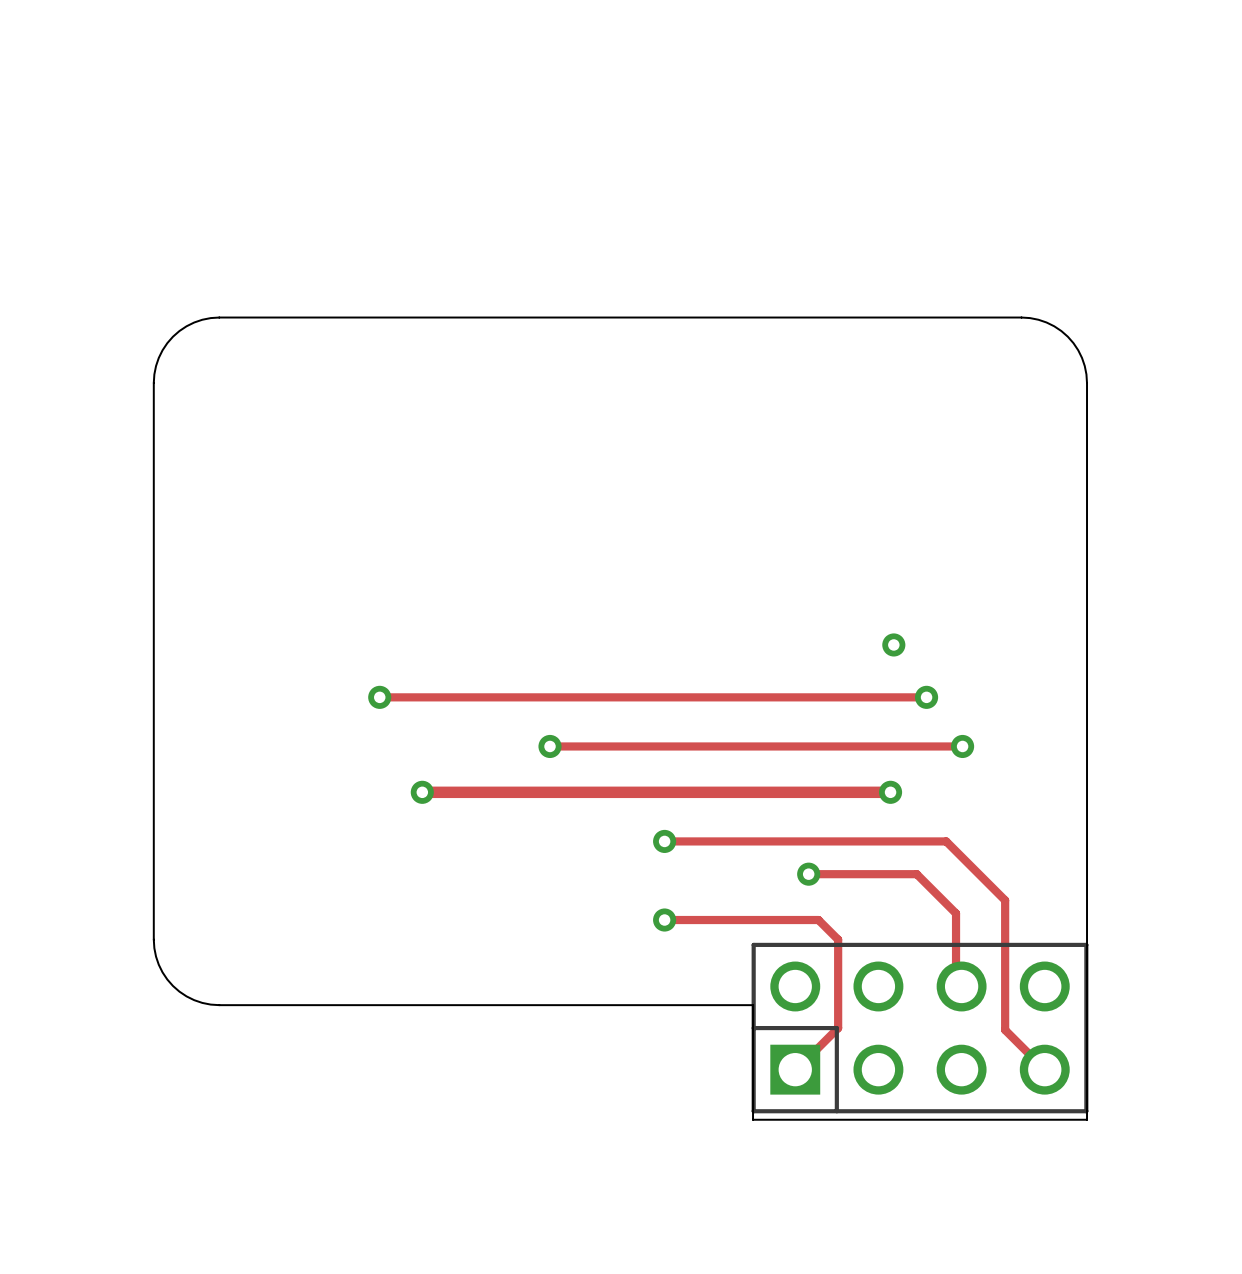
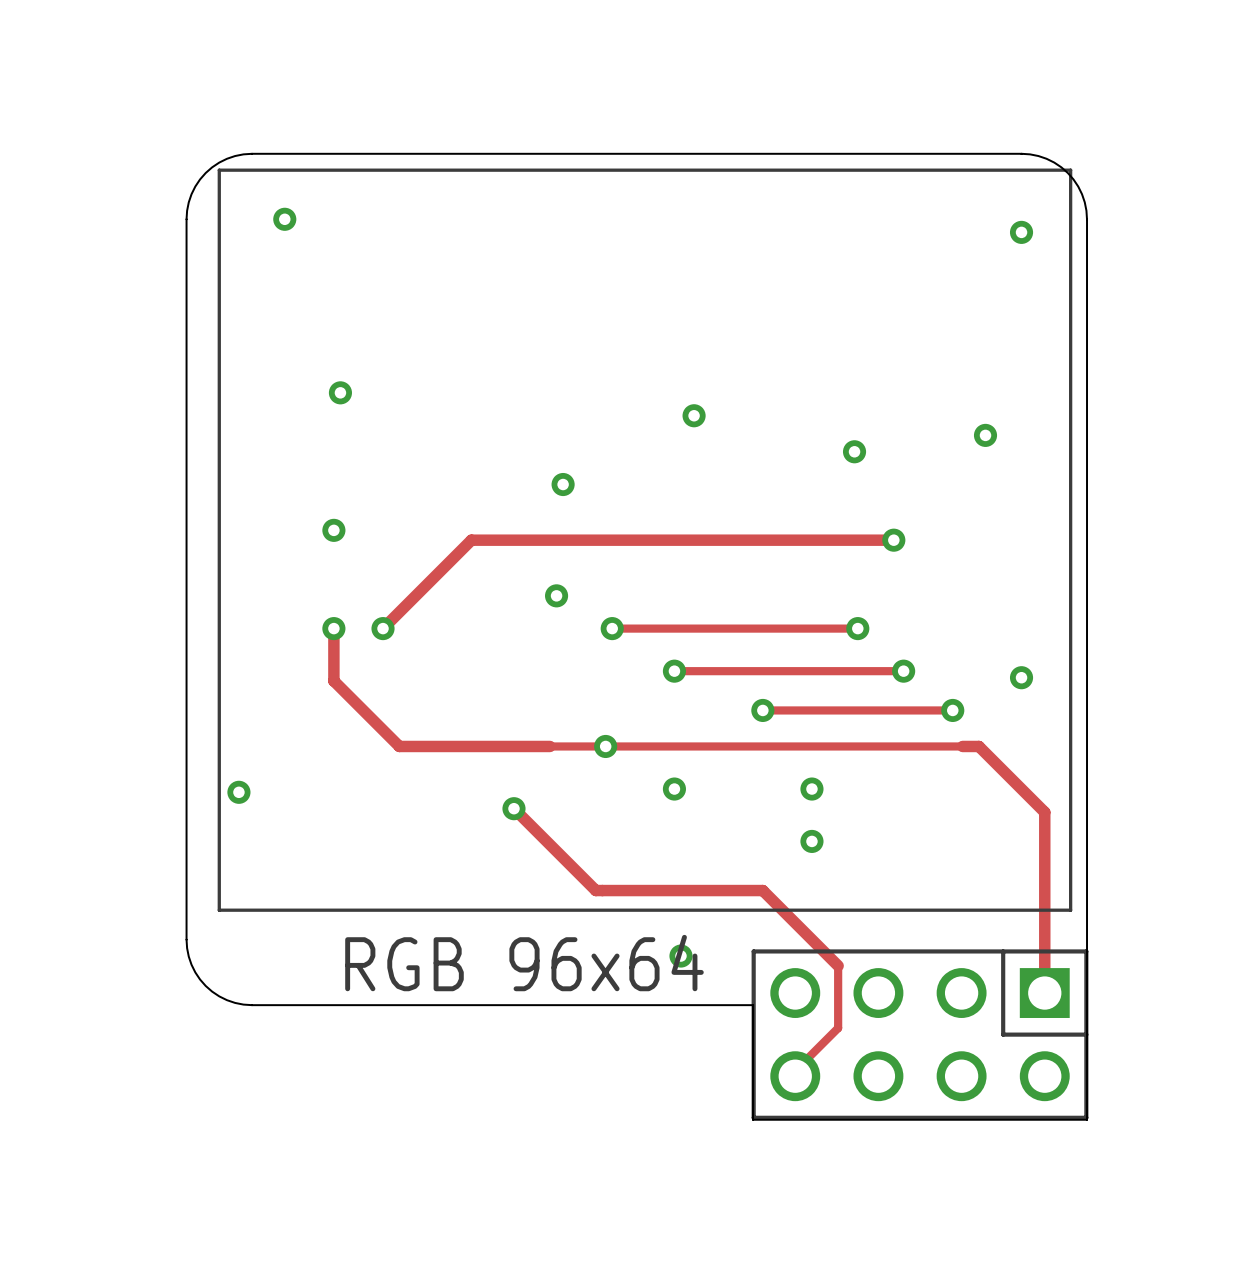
line: none -> (219, 170) (219, 910) (1070, 910) (1070, 170) (219, 170)
via: none -> (284, 219)
via: none -> (1021, 232)
board edge: (1087, 383) (1082, 357) (1067, 336) (1046, 322) (1021, 317) (219, 317) (194, 322) (179, 331) (167, 343) (158, 357) (153, 383) (154, 948) (162, 972) (172, 985) (186, 996) (210, 1004) (252, 1005) -> (1087, 383) (1087, 219) (1084, 202) (1078, 186) (1067, 172) (1054, 162) (1038, 156) (1021, 153) (252, 153) (226, 158) (212, 167) (200, 179) (191, 194) (186, 219) (186, 939) (191, 964) (205, 985) (226, 1000) (252, 1005)
via: none -> (340, 392)
via: none -> (694, 415)
via: none -> (985, 435)
via: none -> (854, 451)
via: none -> (563, 484)
via: none -> (333, 530)
track: none -> (893, 540) (471, 540) (383, 628)
via: none -> (893, 540)
via: none -> (556, 595)
track: none -> (333, 628) (333, 680) (399, 746) (550, 746)
via: none -> (333, 628)
via: none -> (383, 628)
track: none -> (612, 628) (857, 628)
via: none -> (612, 628)
via: none -> (857, 628)
via: (893, 644) -> none
track: none -> (674, 671) (903, 671)
via: none -> (674, 671)
via: none -> (903, 671)
via: none -> (1021, 677)
track: (379, 697) (926, 697) -> none
via: (379, 697) -> none
via: (926, 697) -> none
track: none -> (762, 710) (952, 710)
via: none -> (762, 710)
via: none -> (952, 710)
via: (550, 746) -> none
via: none -> (605, 746)
track: none -> (962, 746) (978, 746) (1044, 812) (1044, 993)
via: (962, 746) -> none
via: none -> (811, 789)
via: none -> (238, 792)
track: (422, 792) (890, 792) -> none
via: (422, 792) -> none
via: (890, 792) -> none
via: none -> (513, 808)
track: (664, 841) (946, 841) (1005, 900) (1005, 1030) (1044, 1069) -> none
via position: (664, 841) -> (674, 789)
track: (808, 874) (916, 874) (956, 913) (956, 980) (961, 986) -> none
via position: (808, 874) -> (811, 841)
track: (664, 920) (818, 920) (838, 939) (838, 965) -> (513, 808) (595, 890) (762, 890) (838, 965)
via position: (664, 920) -> (680, 956)
text: none -> RGB 96x64 (524, 963)
part rotation: 0° (920, 1028) -> 180° (920, 1034)

